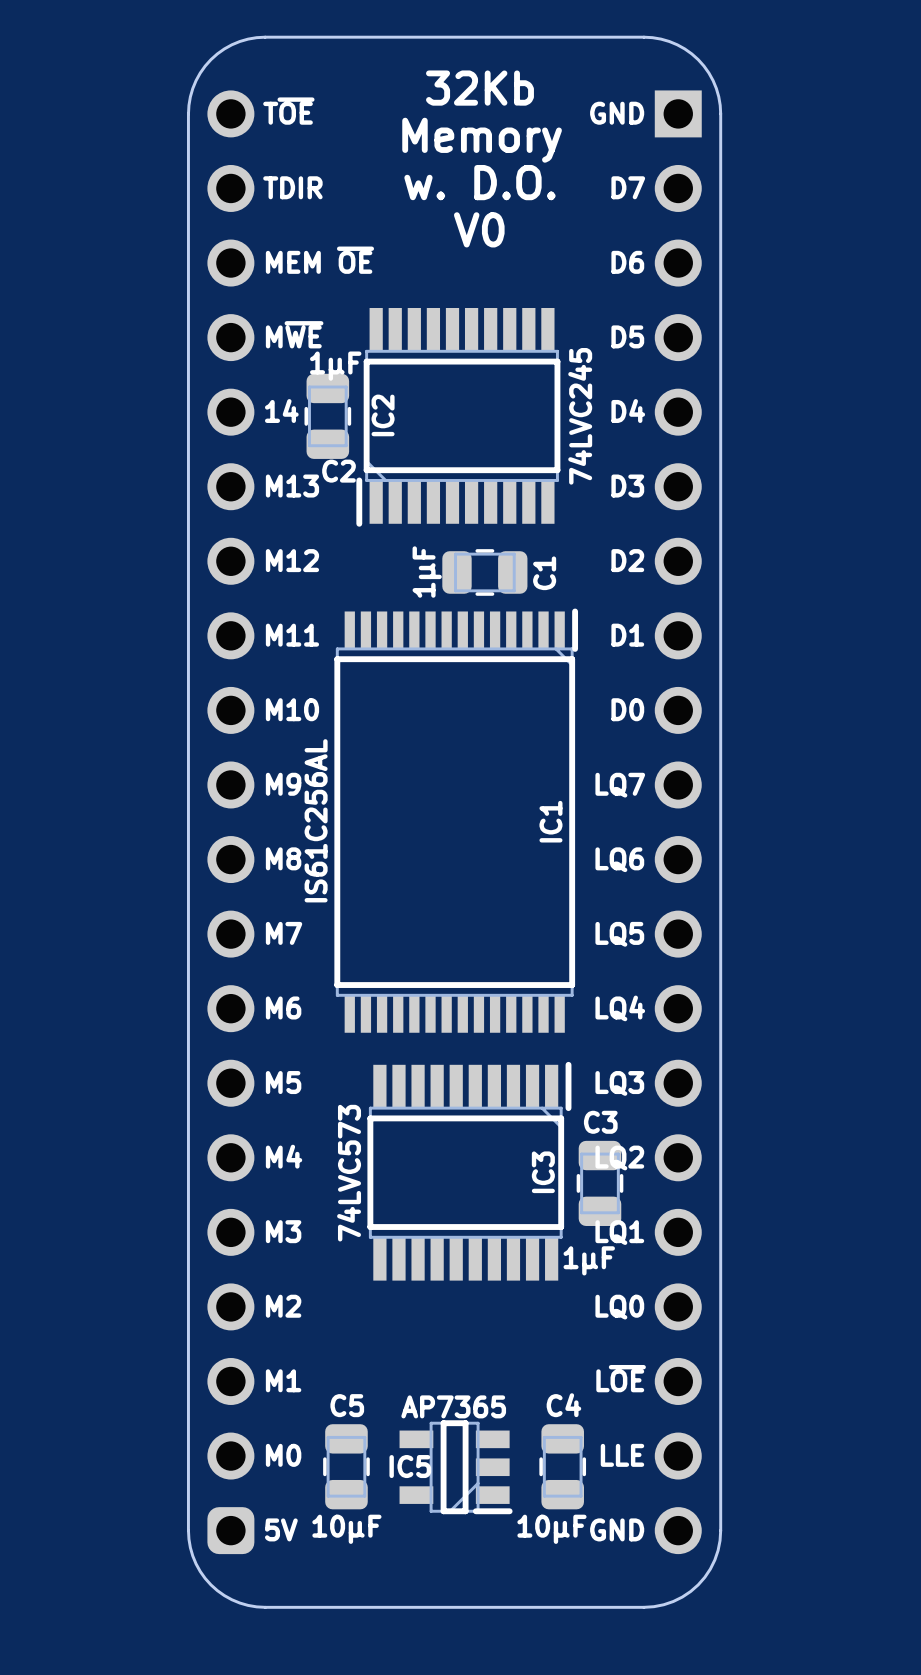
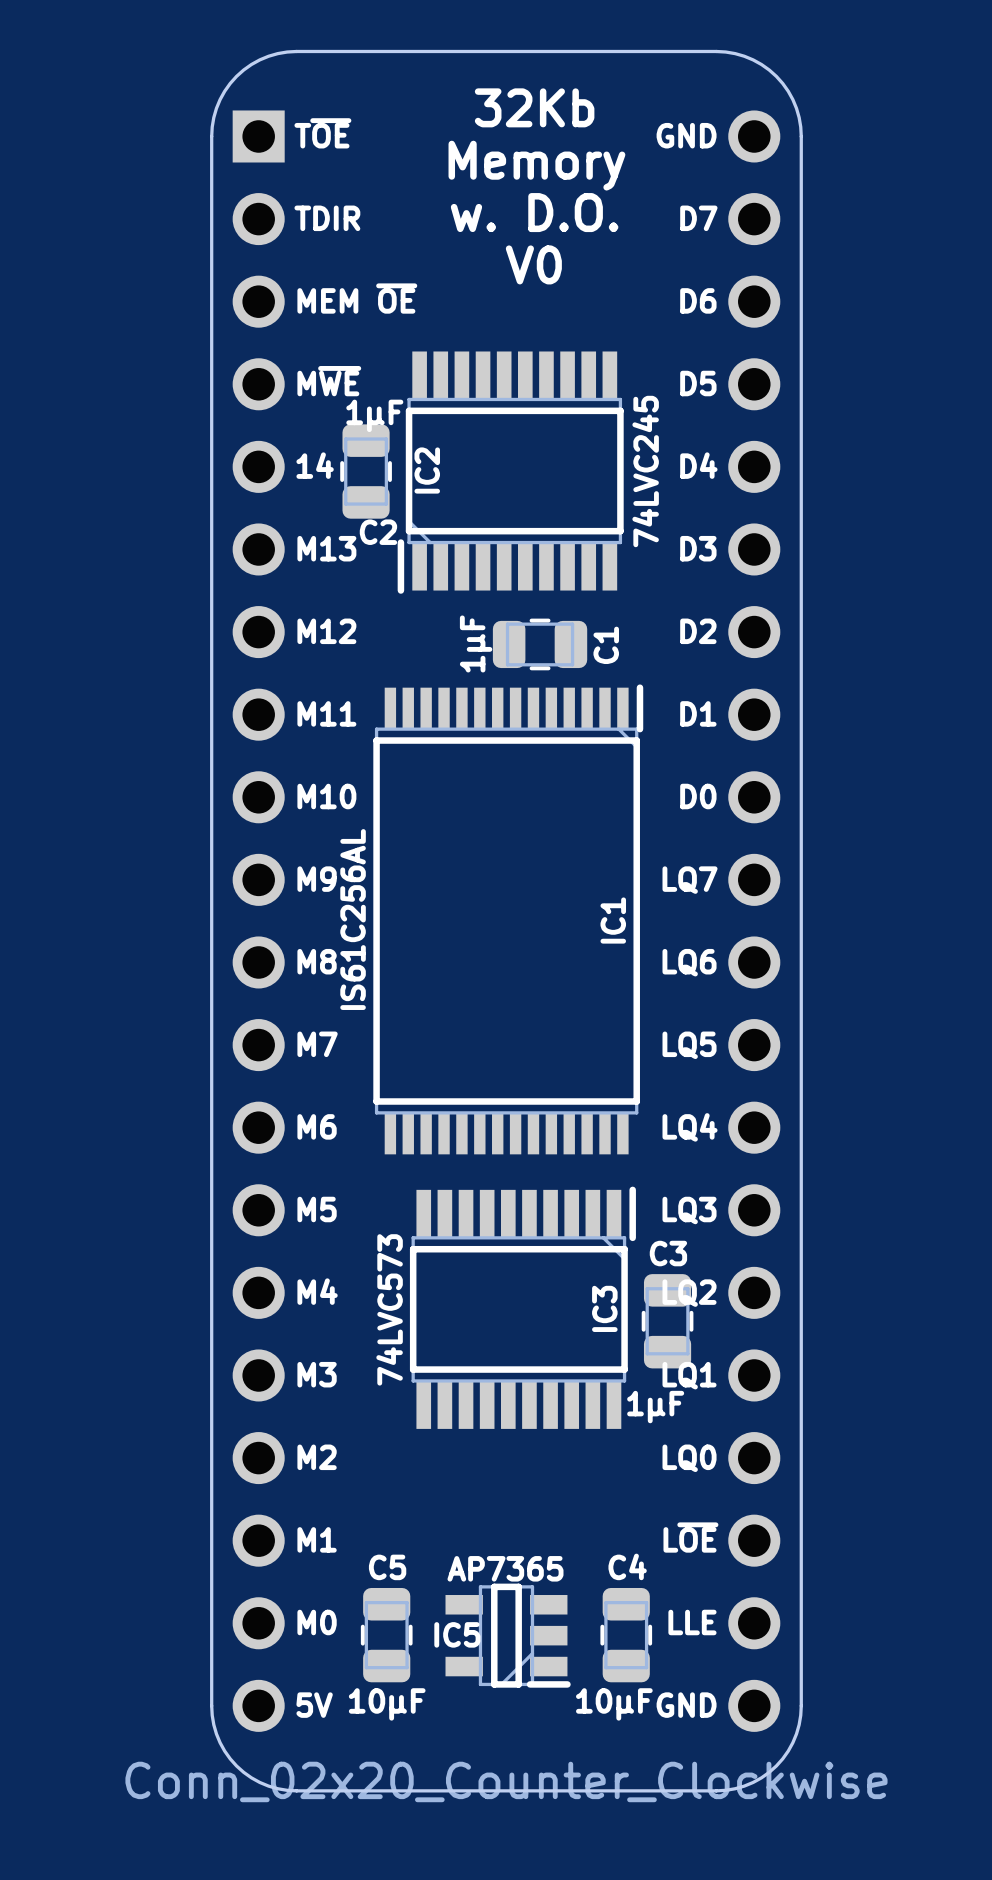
part footprint: [187, 35, 723, 1609] -> [232, 110, 781, 1732]
board edge: none -> (296, 51) (725, 52) (744, 56) (769, 70) (788, 91) (799, 117) (801, 136) (801, 1705) (796, 1733) (782, 1758) (761, 1777) (735, 1788) (716, 1790) (287, 1790) (259, 1782) (243, 1772) (224, 1751) (213, 1724) (211, 1705) (211, 136) (213, 117) (220, 99) (236, 76) (251, 64) (268, 56) (296, 51)
part value: none -> Conn_02x20_Counter_Clockwise (506, 1781)

